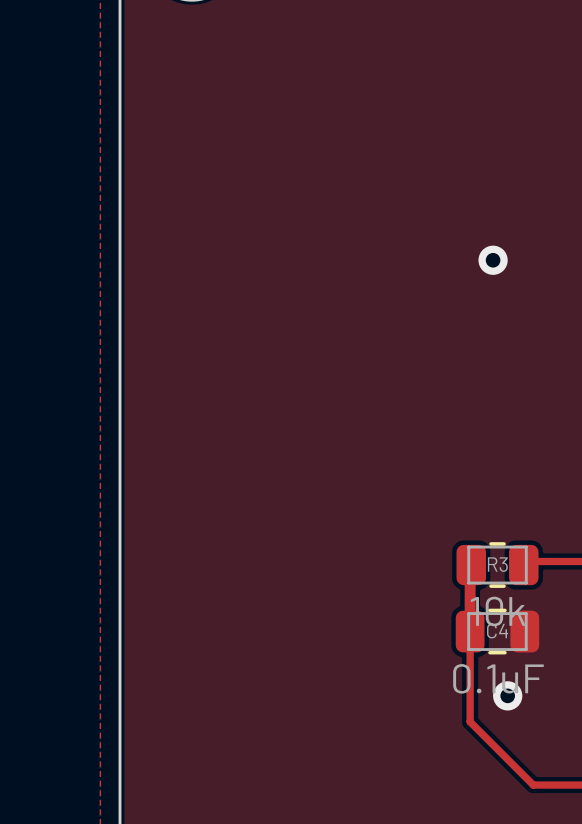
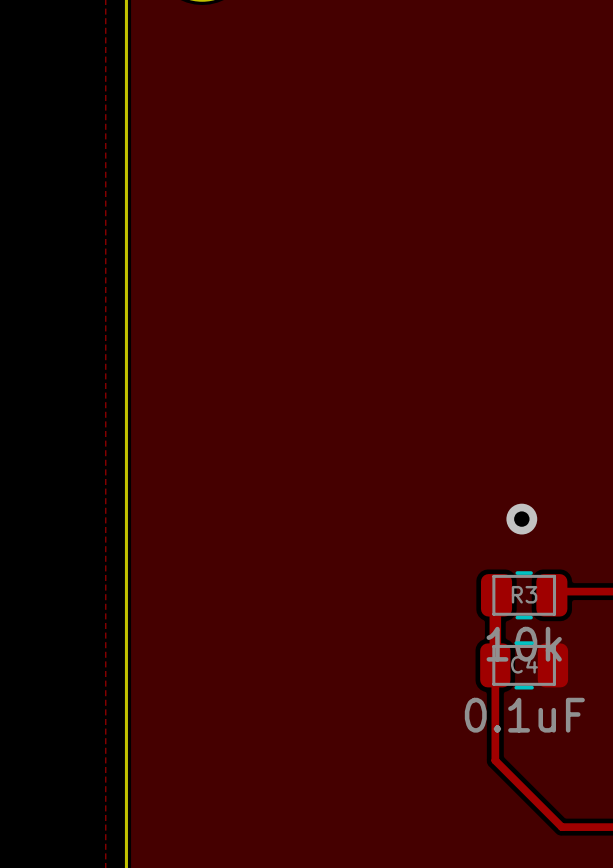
via: (493, 260) -> none
via: none -> (521, 519)
via: (507, 695) -> none

